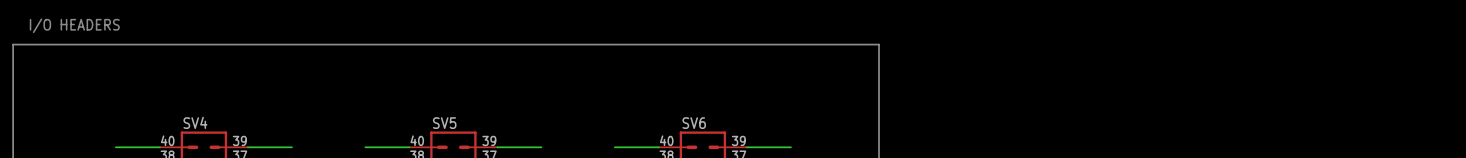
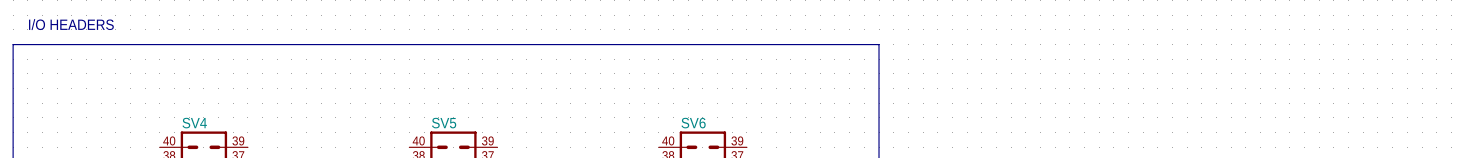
wire: (115, 147) (159, 147) -> none
wire: (247, 147) (291, 147) -> none
wire: (365, 147) (409, 147) -> none
wire: (497, 147) (541, 147) -> none
wire: (614, 147) (658, 147) -> none
wire: (746, 147) (790, 147) -> none

